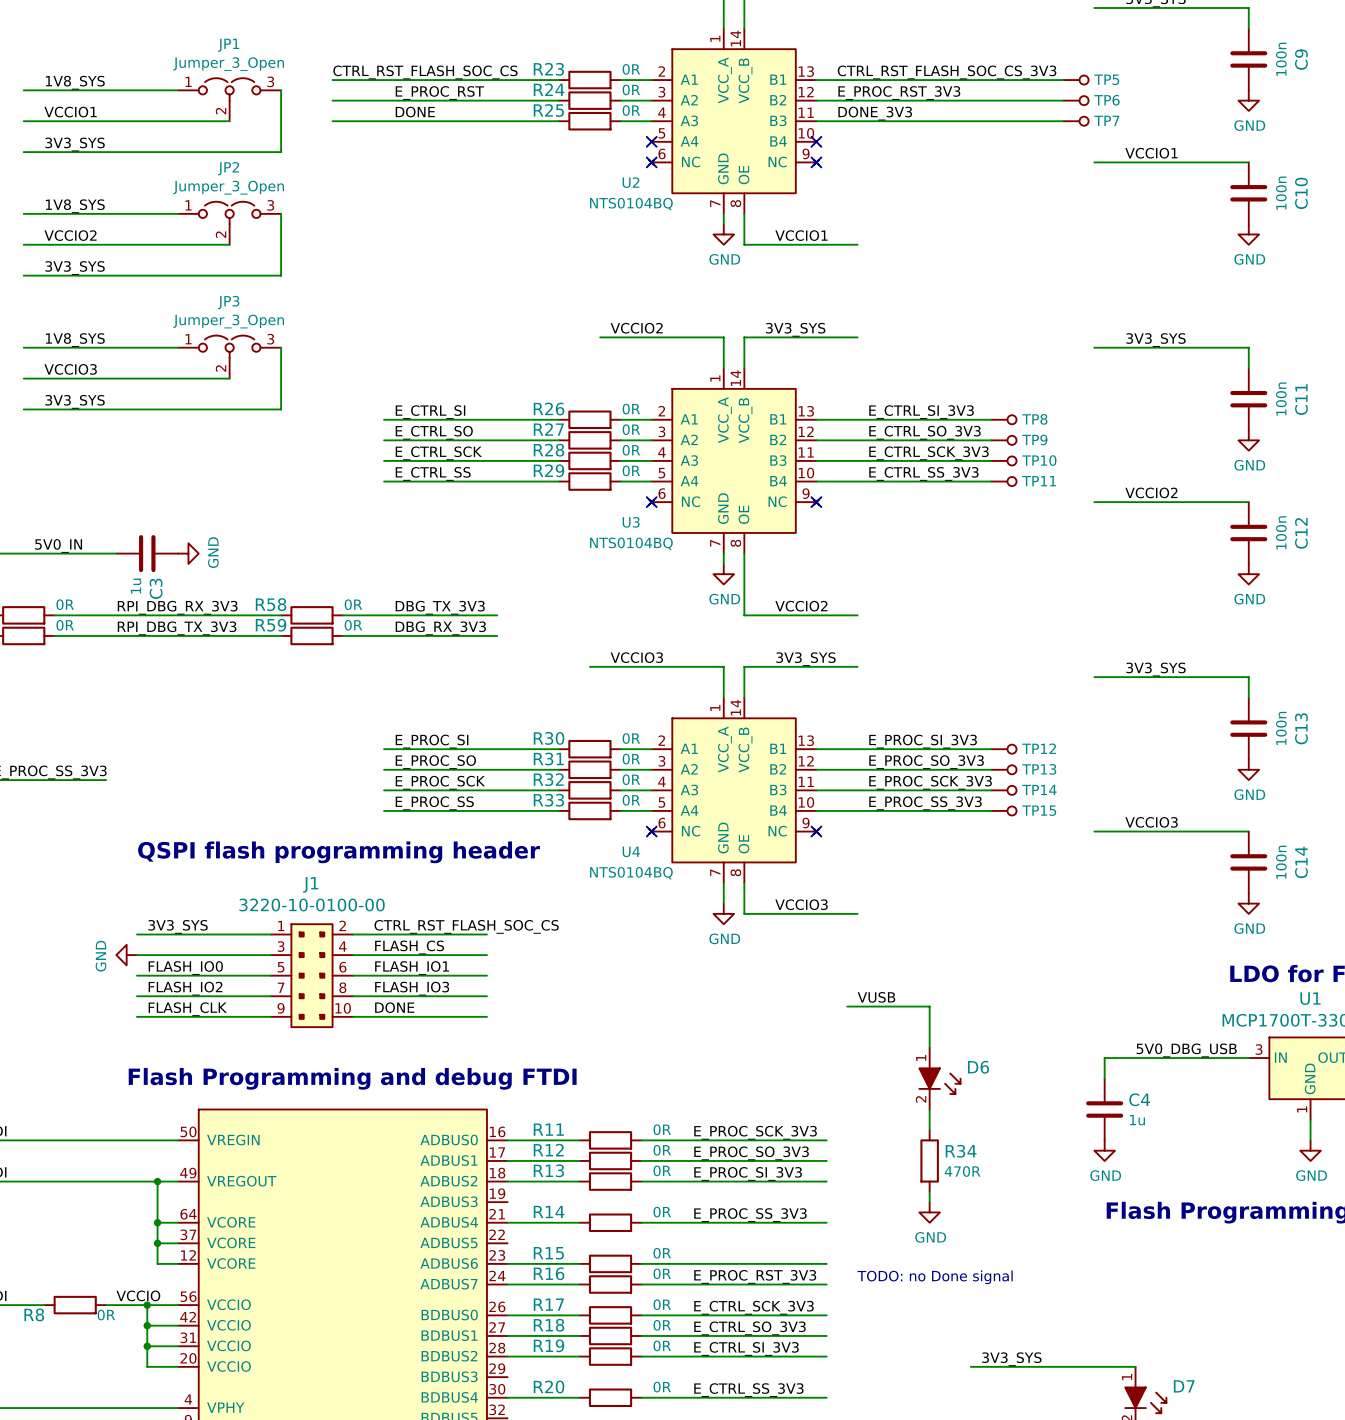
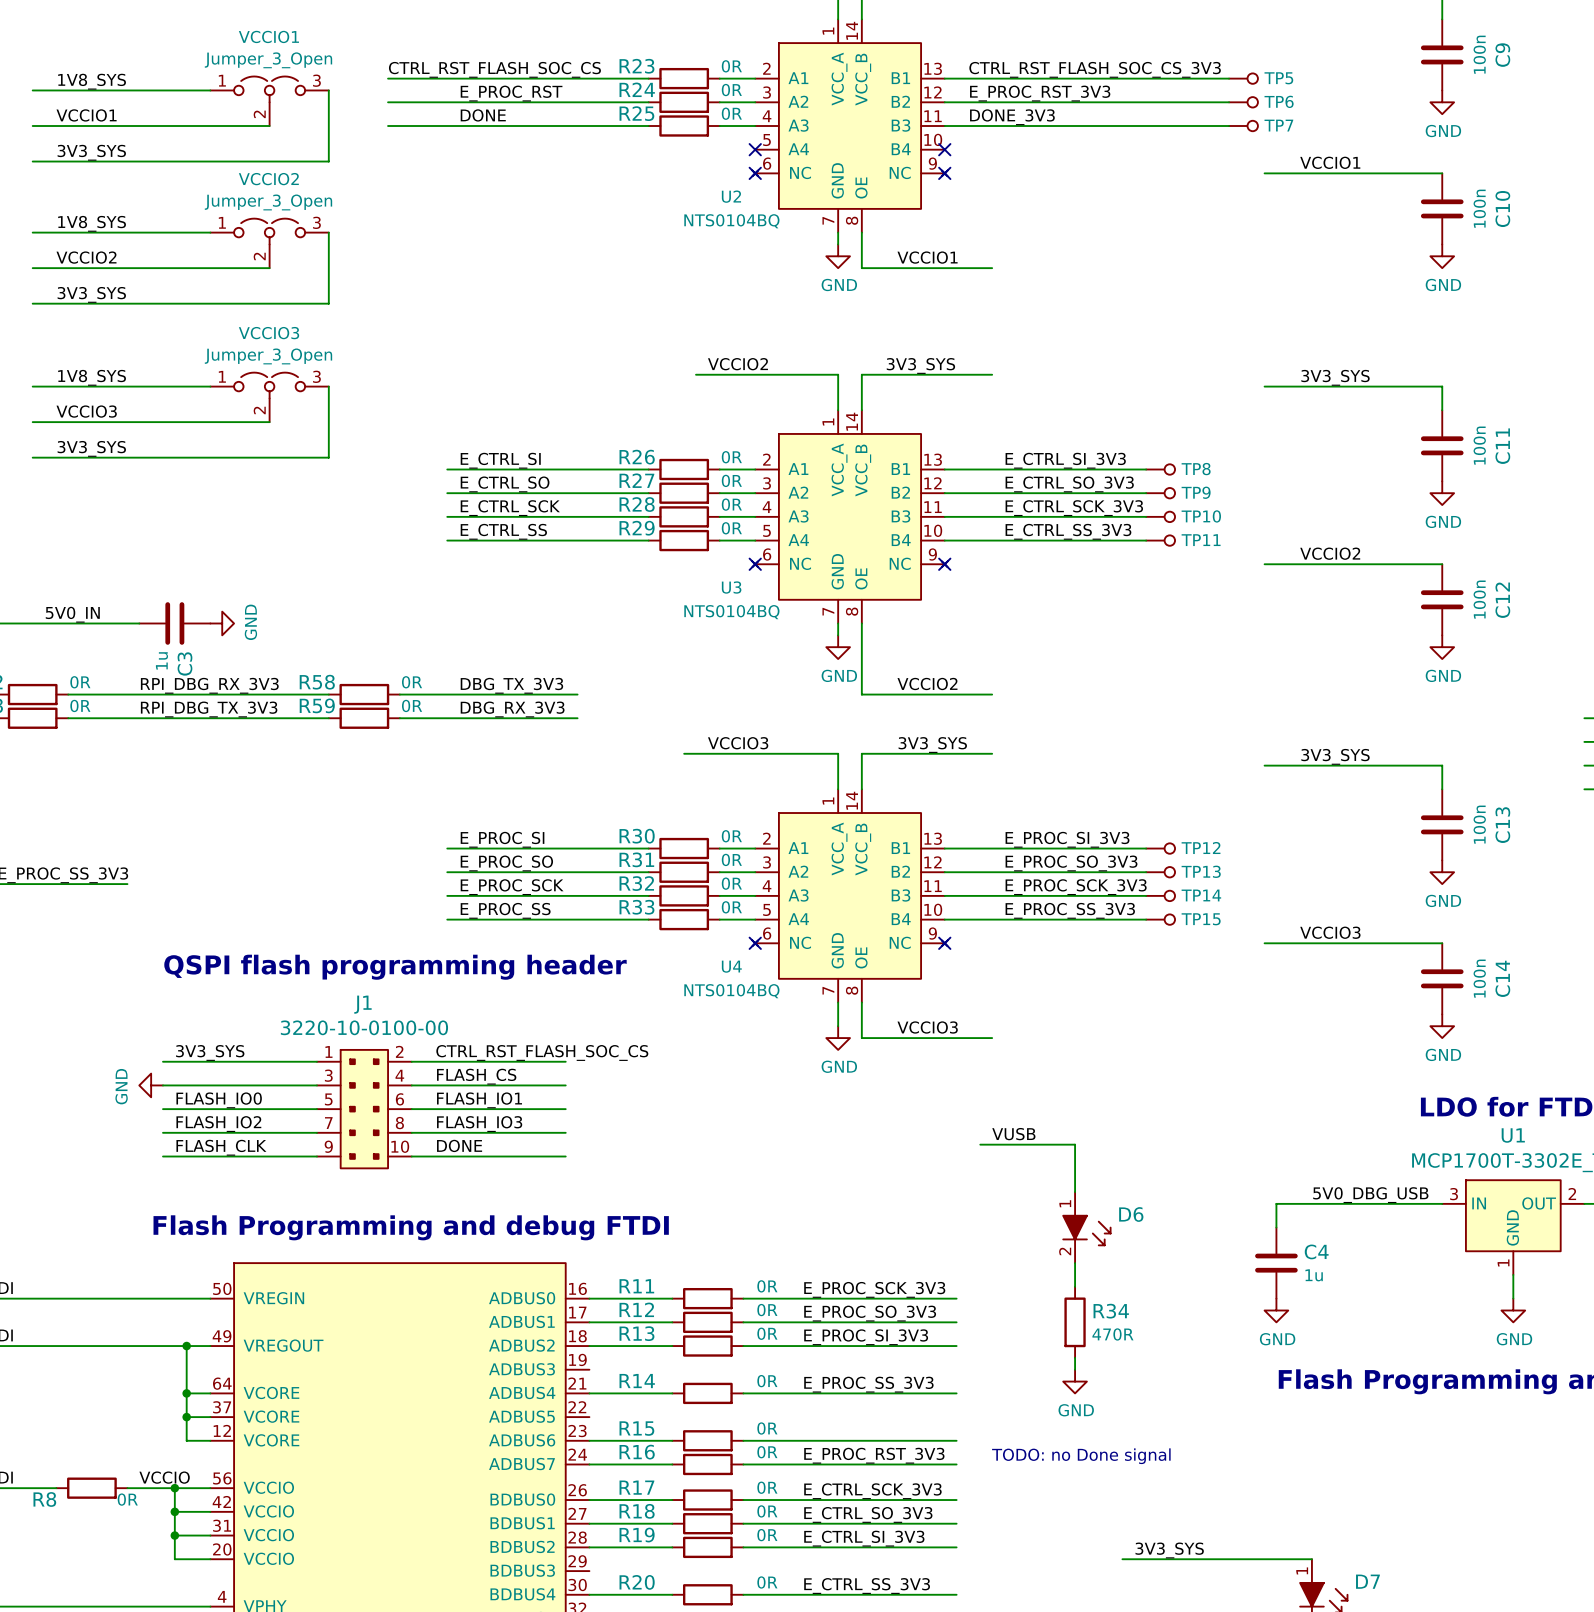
JP1 name: JP1 (228, 45) -> VCCIO1 (268, 36)
JP2 name: JP2 (228, 168) -> VCCIO2 (268, 179)
JP3 name: JP3 (228, 302) -> VCCIO3 (269, 333)

